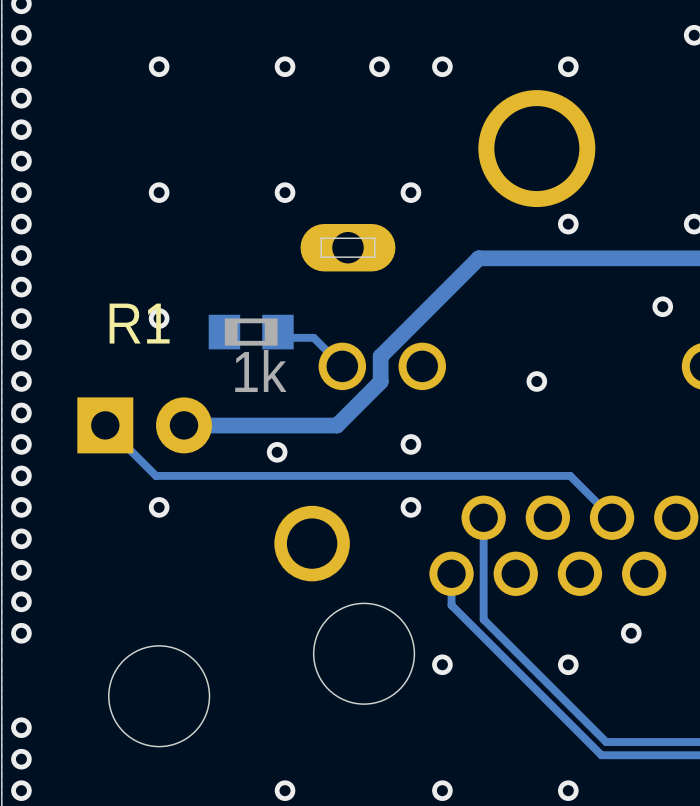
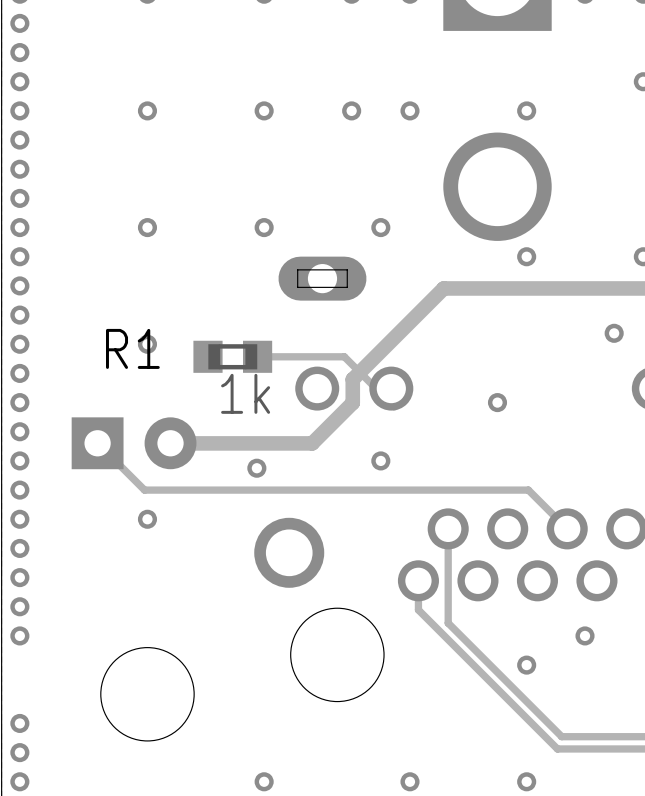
track: (277, 332) (283, 337) (313, 337) (342, 366) -> (257, 356) (344, 356) (394, 406)
via: (410, 507) -> none
via: (442, 664) -> none

